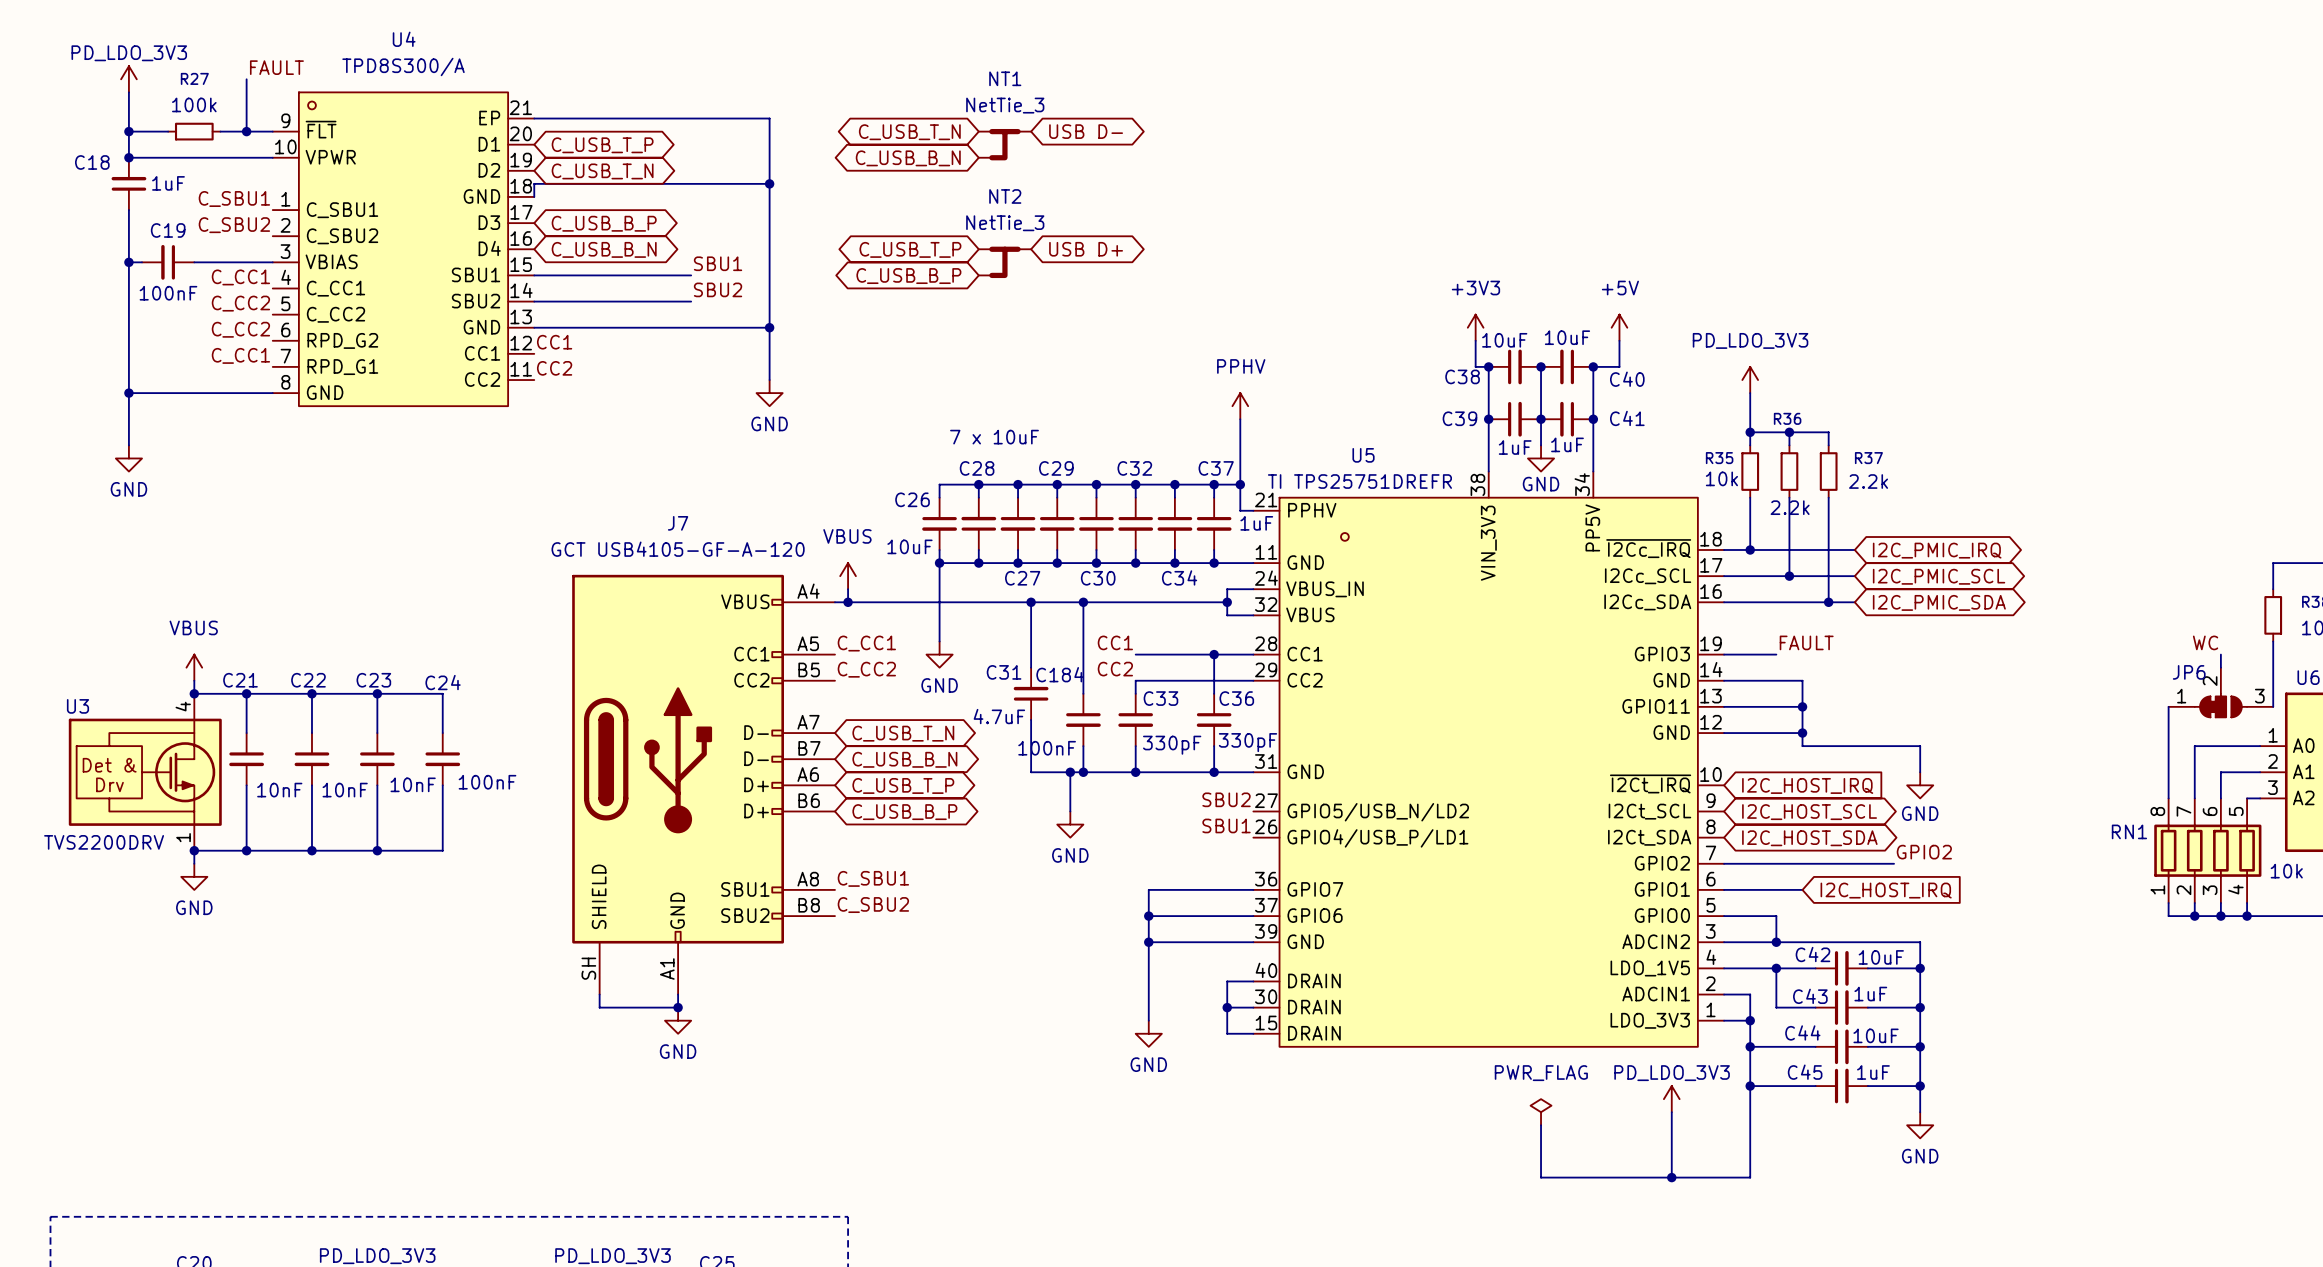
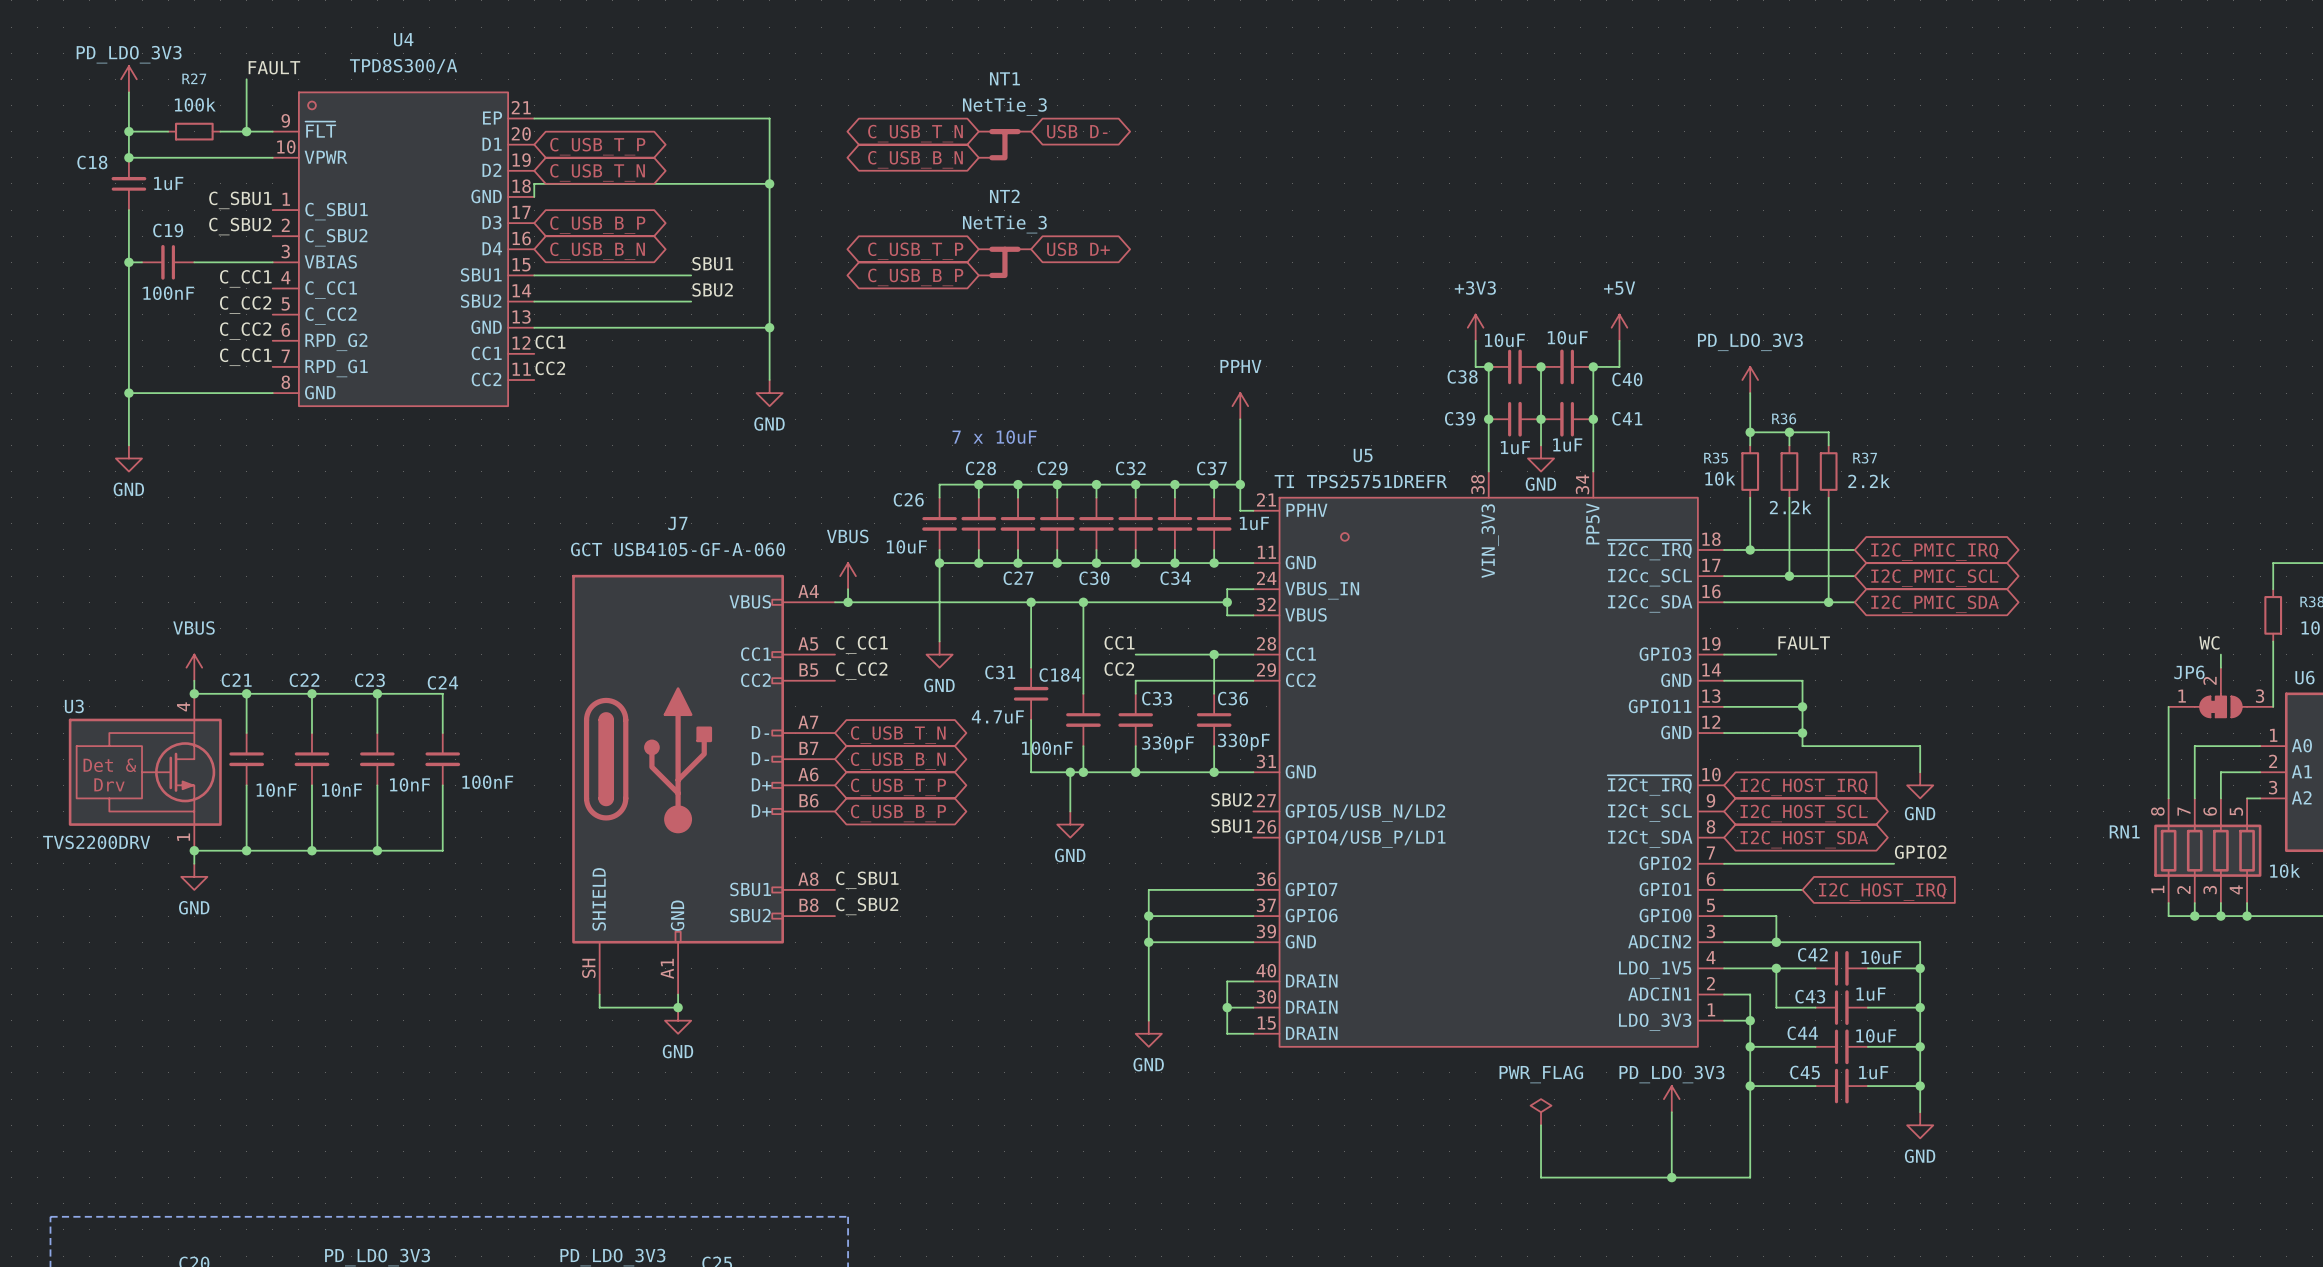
J7 value: GCT USB4105-GF-A-120 (678, 549) -> GCT USB4105-GF-A-060 (677, 549)

